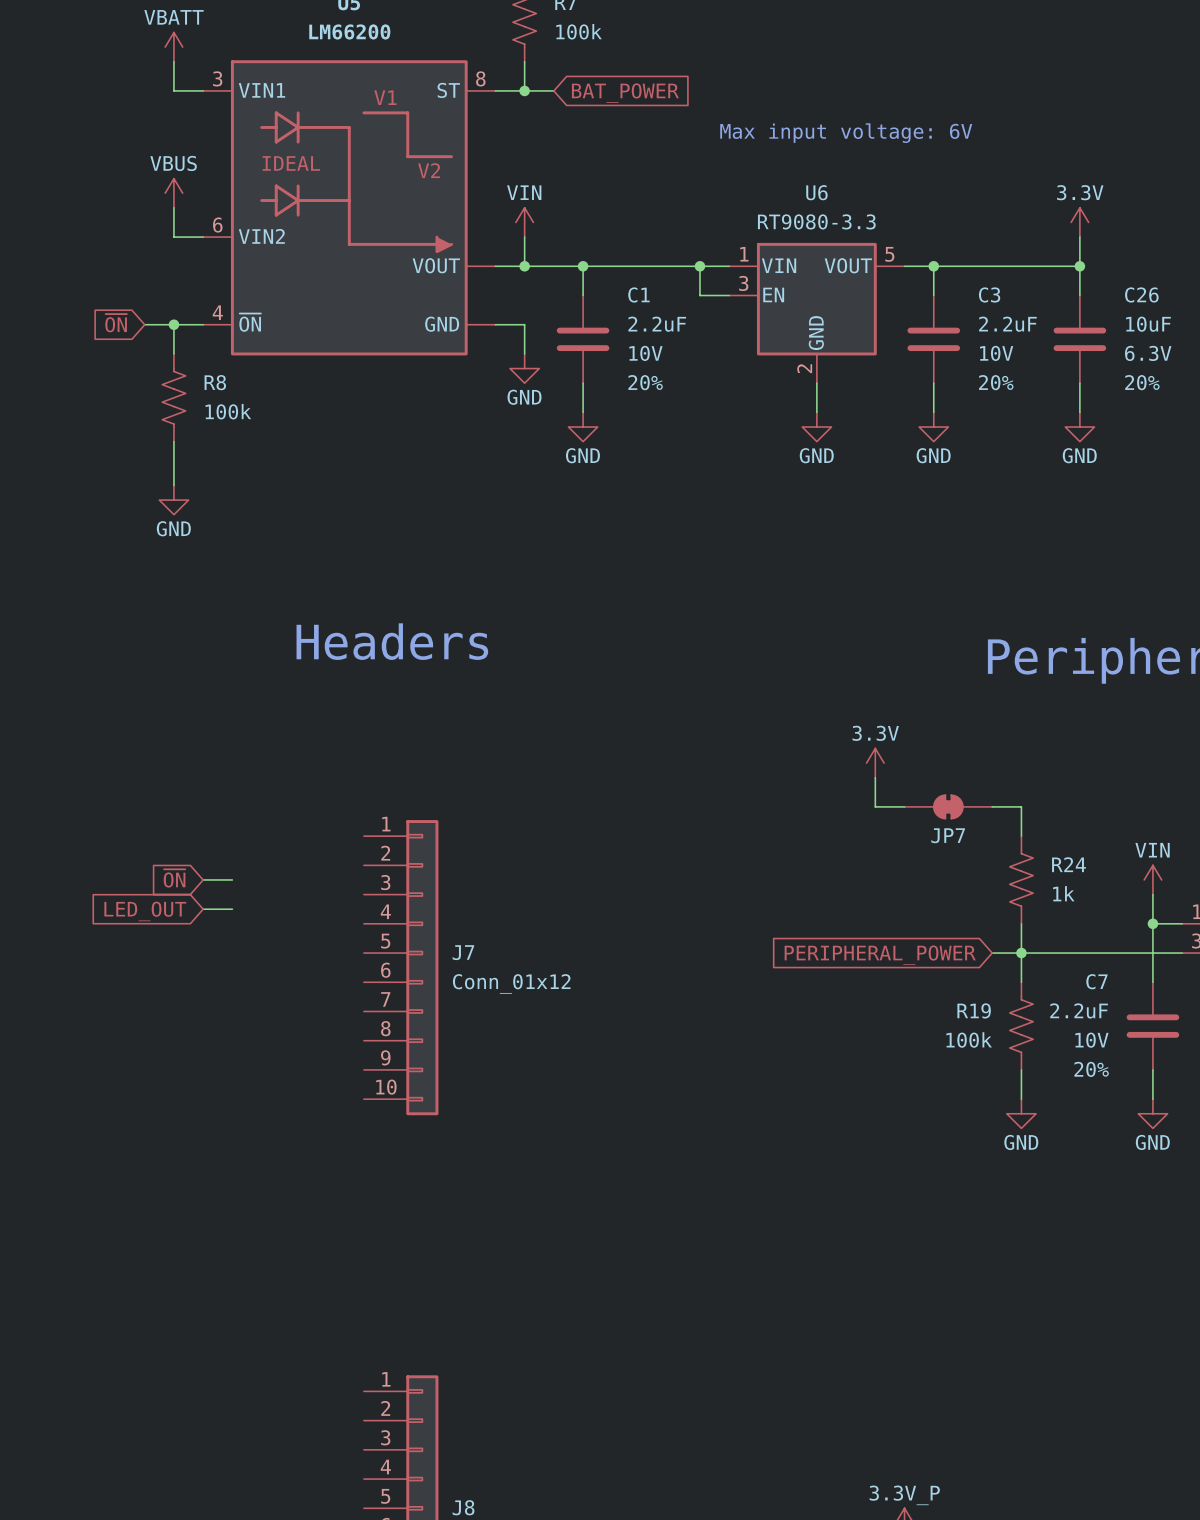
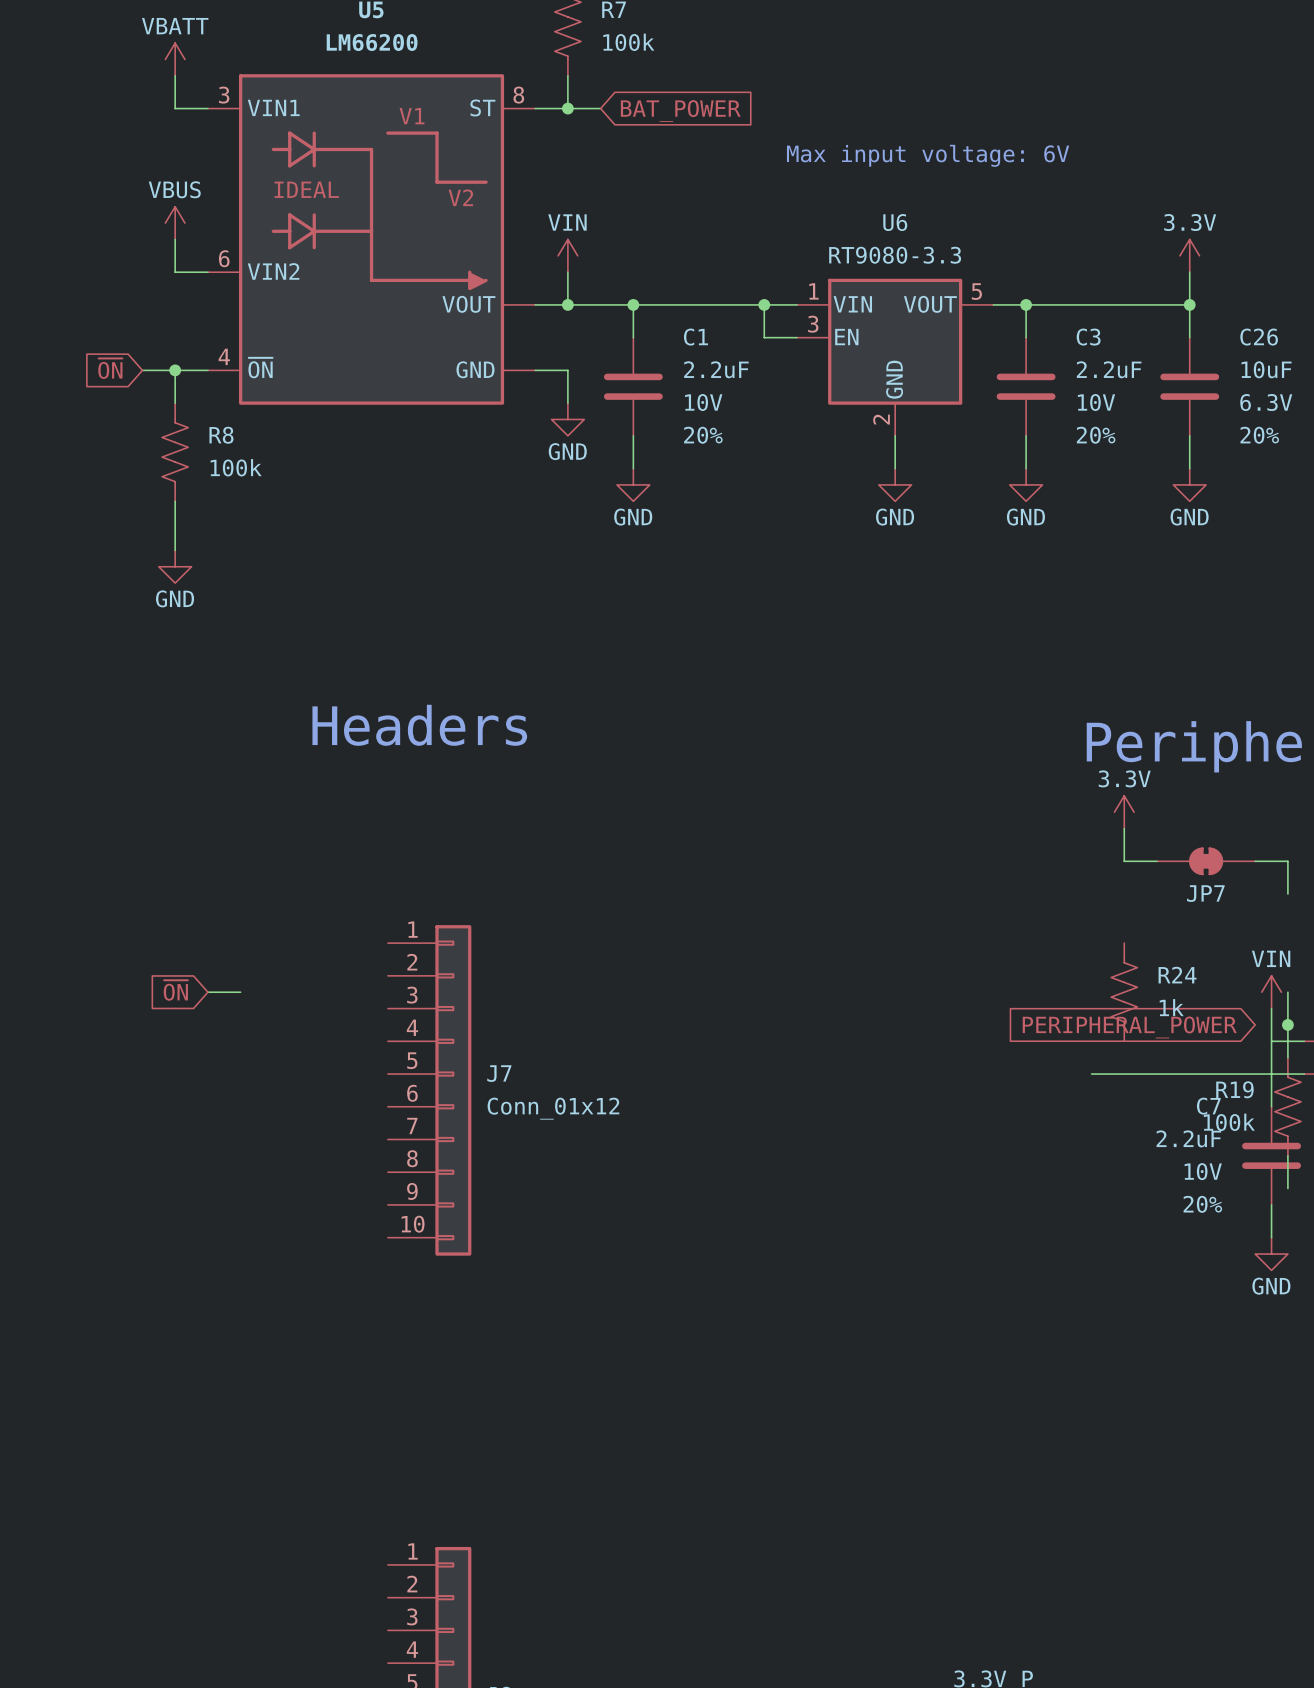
power symbol position: 3.3V (875, 763) -> 3.3V (1124, 812)
wire: (875, 777) (875, 806) (904, 806) -> (1124, 828) (1124, 861) (1157, 861)
JP7 position: (948, 806) -> (1206, 861)
wire: (992, 806) (1021, 806) (1021, 836) -> (1255, 861) (1287, 861) (1287, 894)
wire: (203, 909) (232, 909) -> none
global label: LED_OUT (145, 911) -> none
wire: (1021, 923) (1021, 982) -> (1287, 992) (1287, 1057)
junction position: (1152, 923) -> (1287, 1024)
junction: (1021, 953) -> none
global label position: PERIPHERAL_POWER (880, 955) -> PERIPHERAL_POWER (1129, 1027)
R19 position: (1021, 1026) -> (1287, 1106)
wire: (1021, 1069) (1021, 1099) -> (1287, 1155) (1287, 1188)
power symbol: GND (1021, 1113) -> none

